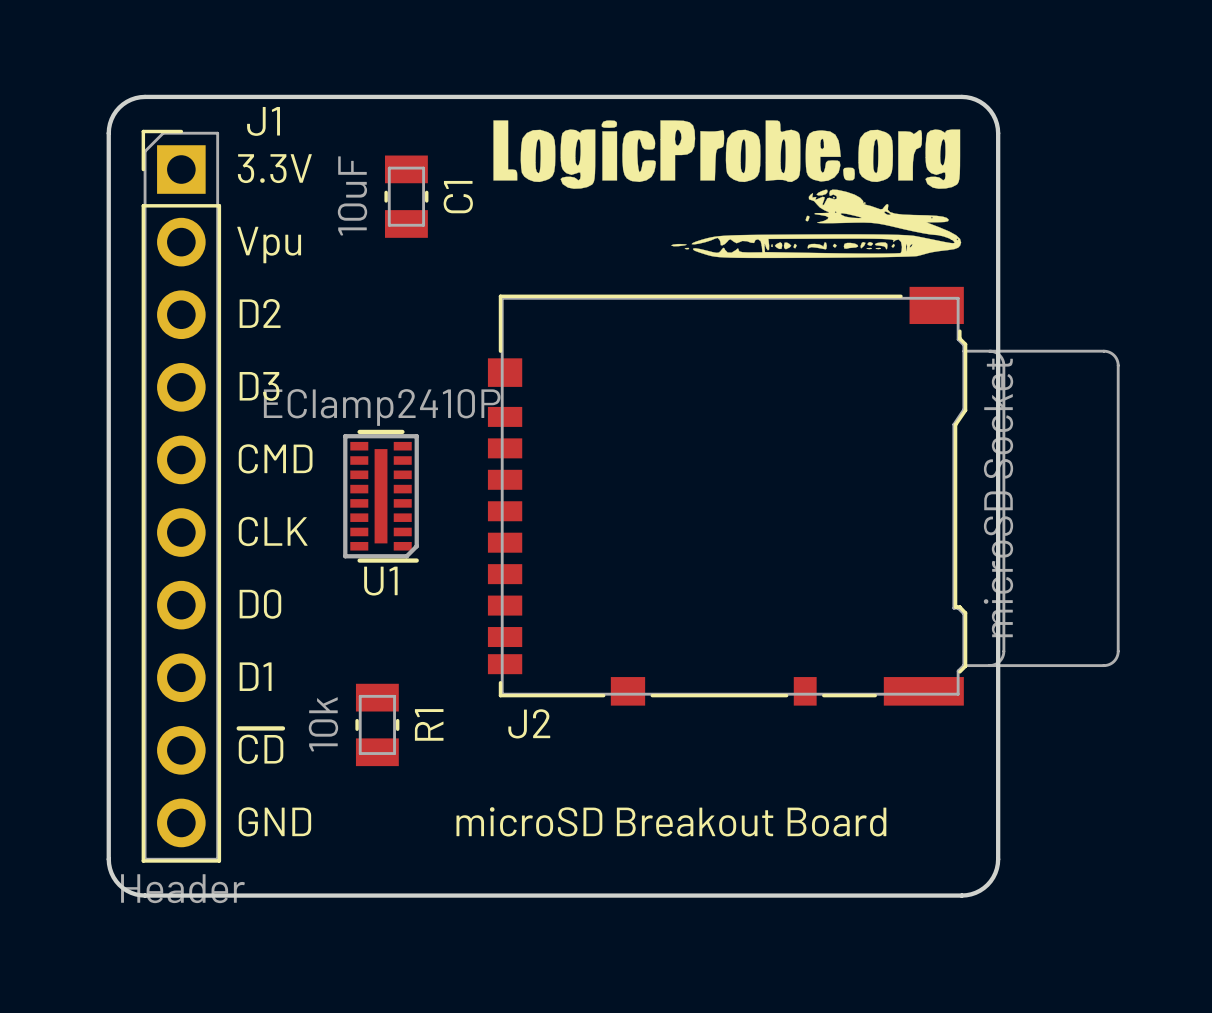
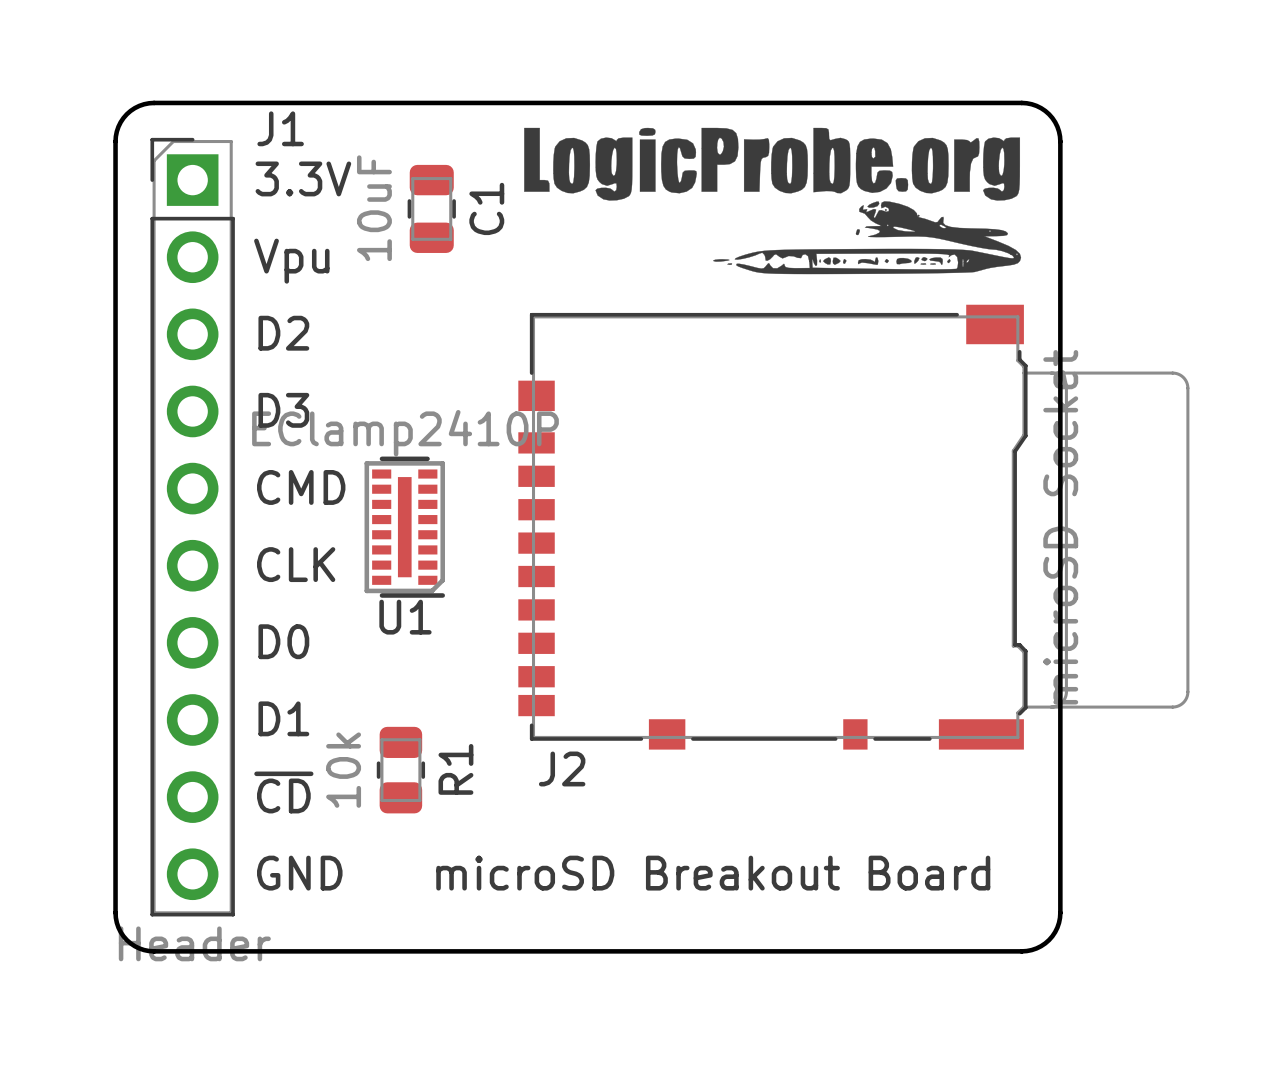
C1 footprint: [384, 155, 429, 238] -> [407, 164, 456, 253]
R1 footprint: [355, 683, 400, 767] -> [376, 726, 426, 814]

